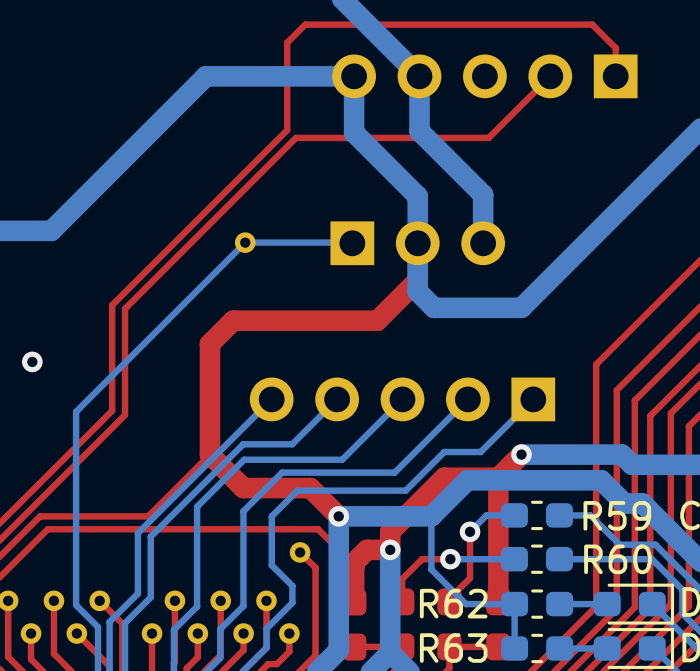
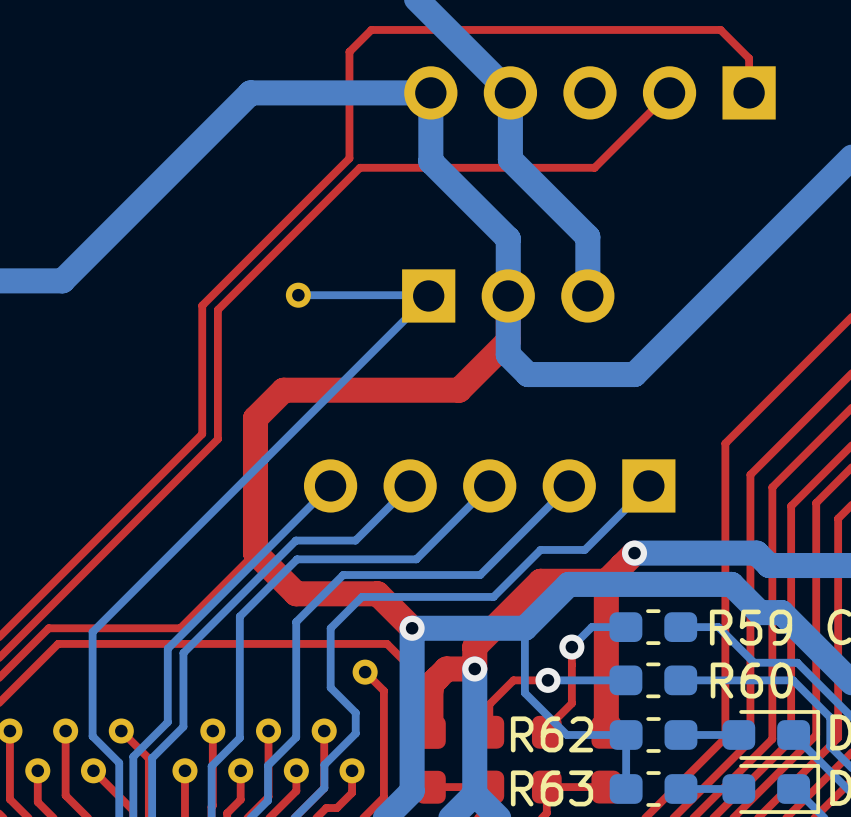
bottom track: (245, 242) (76, 411) (76, 519) -> (428, 295) (92, 632)
top track: (166, 251) (112, 305) (112, 410) -> (202, 305) (202, 434) (136, 499)
top track: (179, 254) (125, 308) (125, 415) -> (217, 309) (217, 439) (152, 504)
via: (32, 361) -> none

